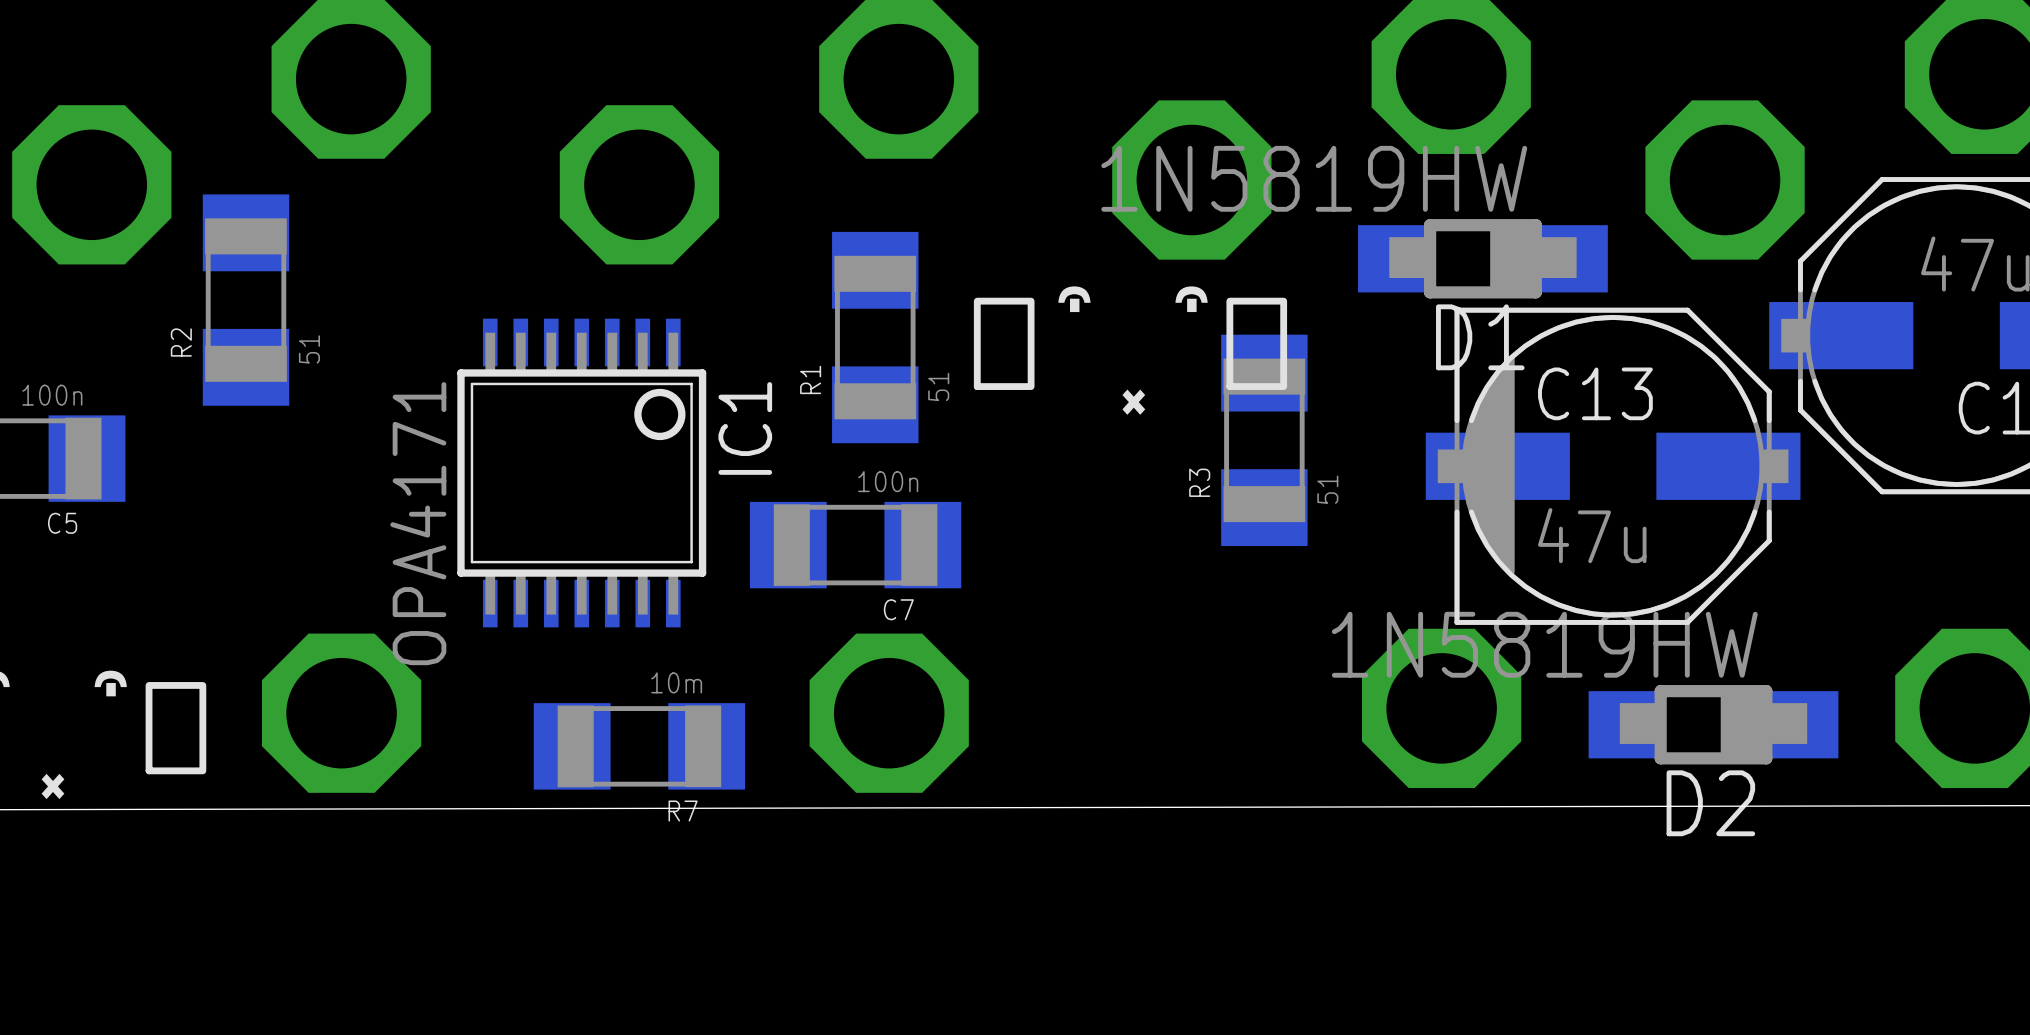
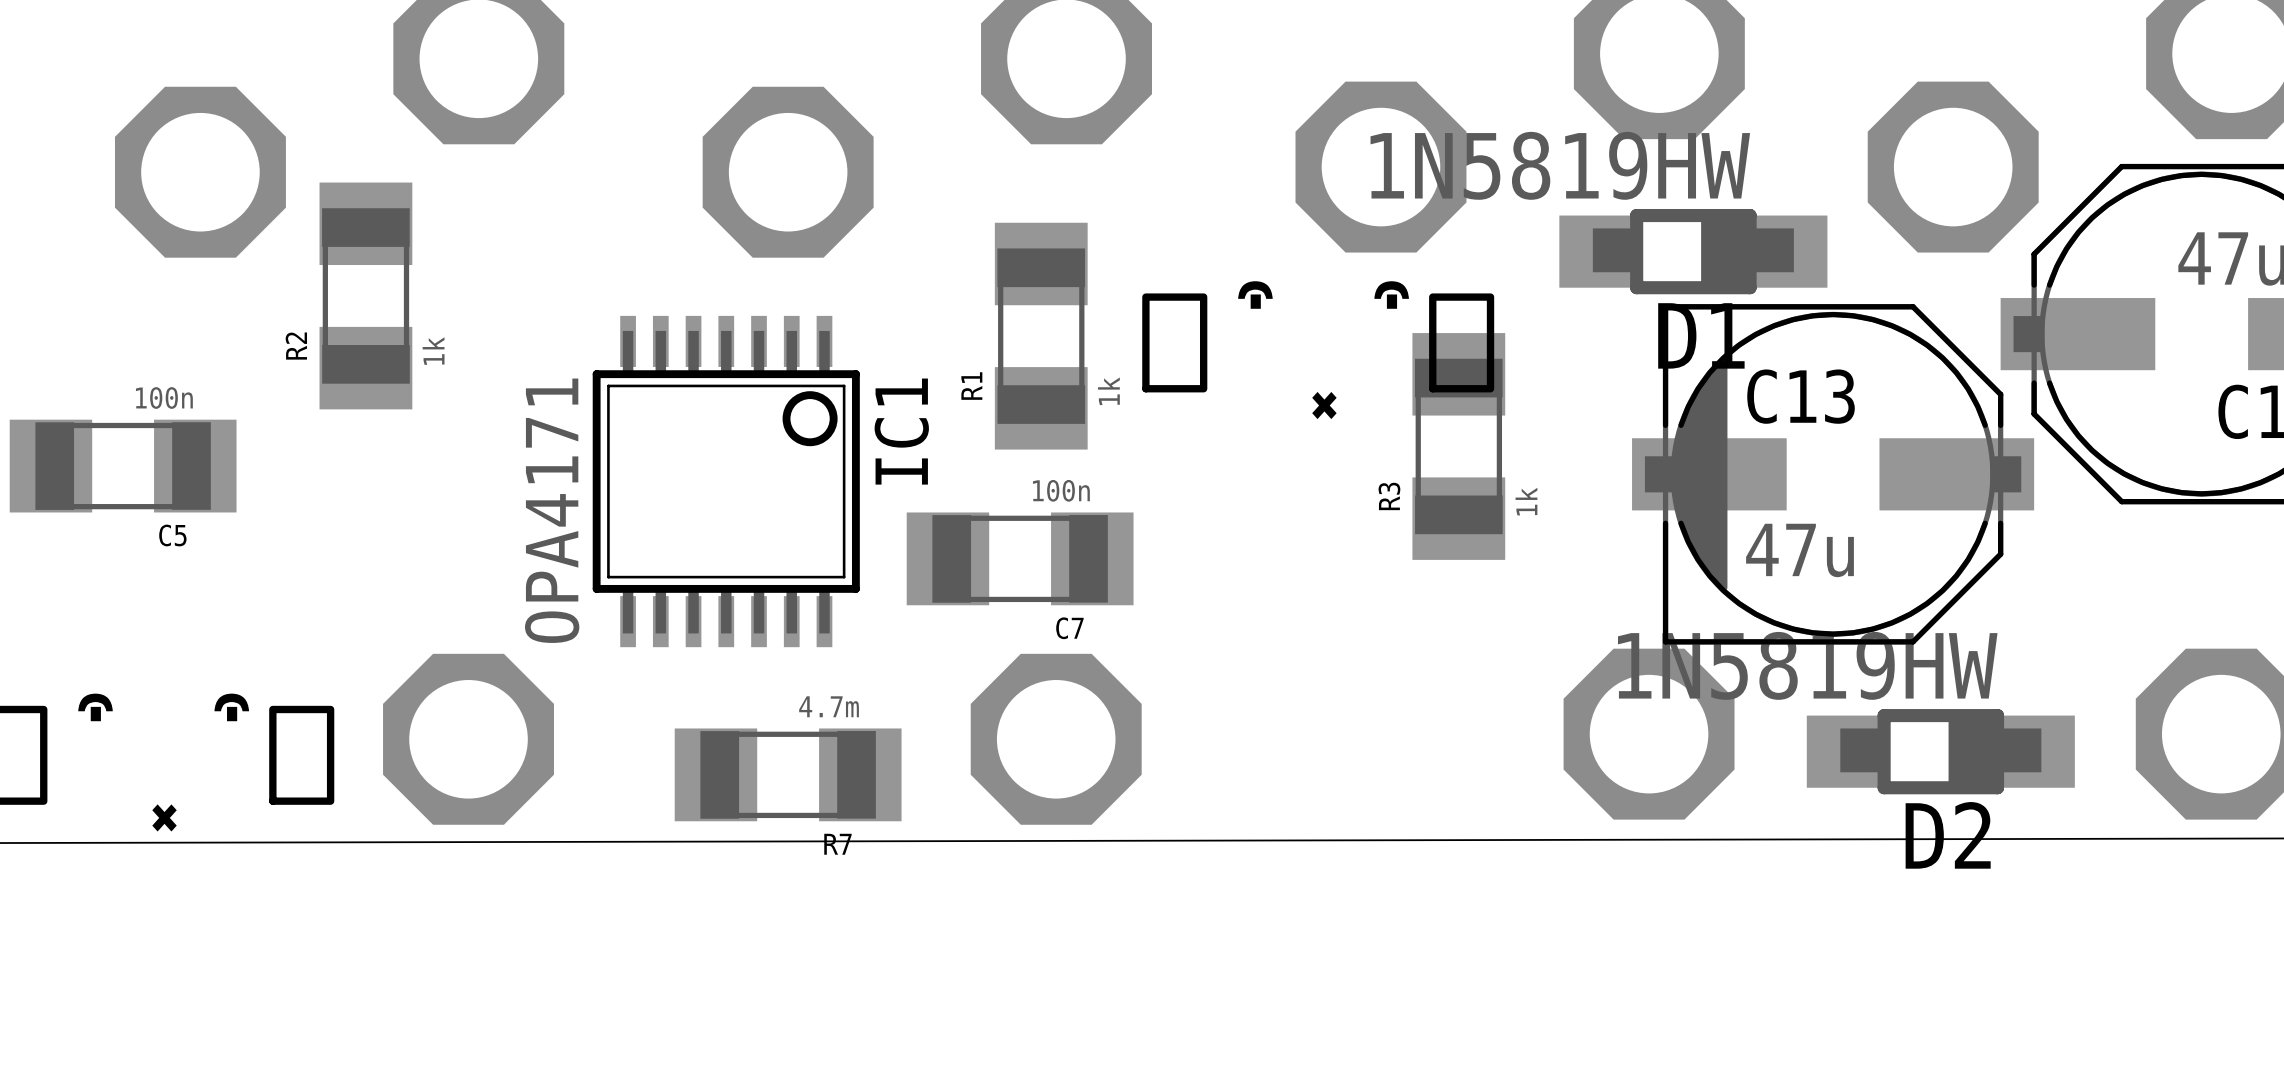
R2 value: 51 (309, 349) -> 1k (433, 351)
R1 value: 51 (938, 386) -> 1k (1108, 391)
R3 value: 51 (1327, 489) -> 1k (1526, 501)
R7 value: 10m (676, 682) -> 4.7m (829, 706)

